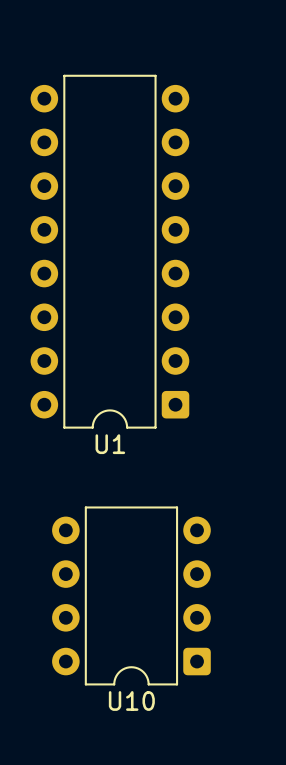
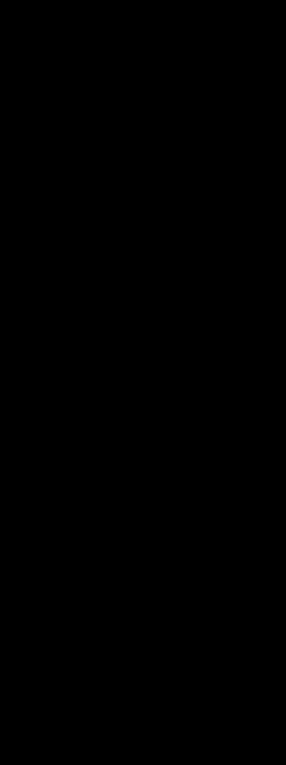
U1: (109, 251) -> none
U10: (131, 595) -> none

